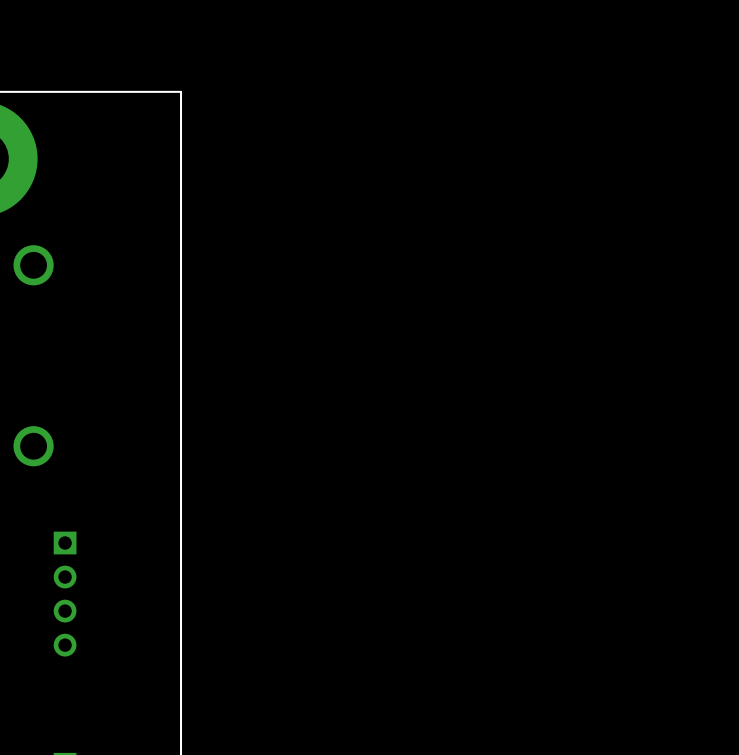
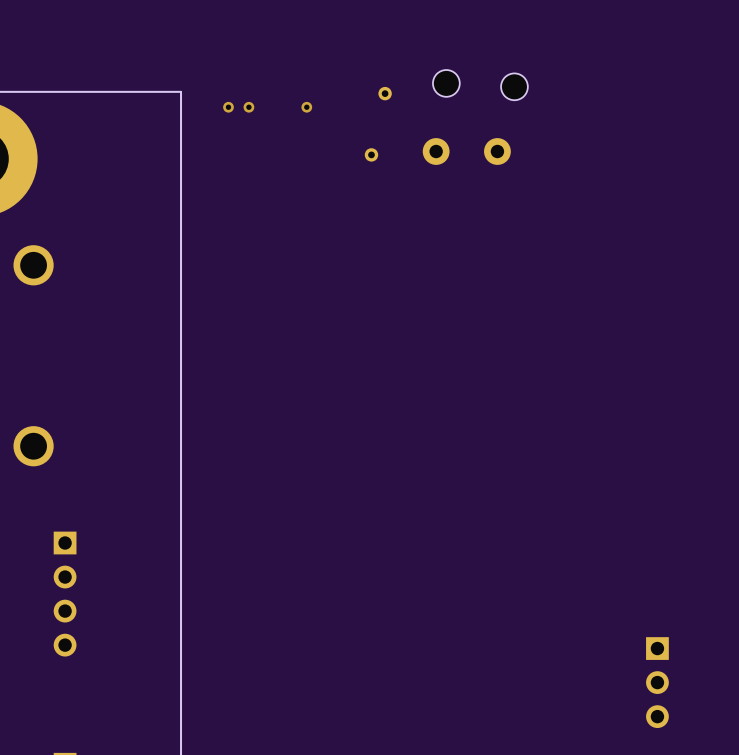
part: none -> (446, 83)
part: none -> (514, 86)
part: none -> (385, 93)
via: none -> (228, 107)
via: none -> (248, 107)
via: none -> (306, 107)
part: none -> (436, 151)
part: none -> (497, 151)
part: none -> (371, 154)
part: none -> (657, 682)

